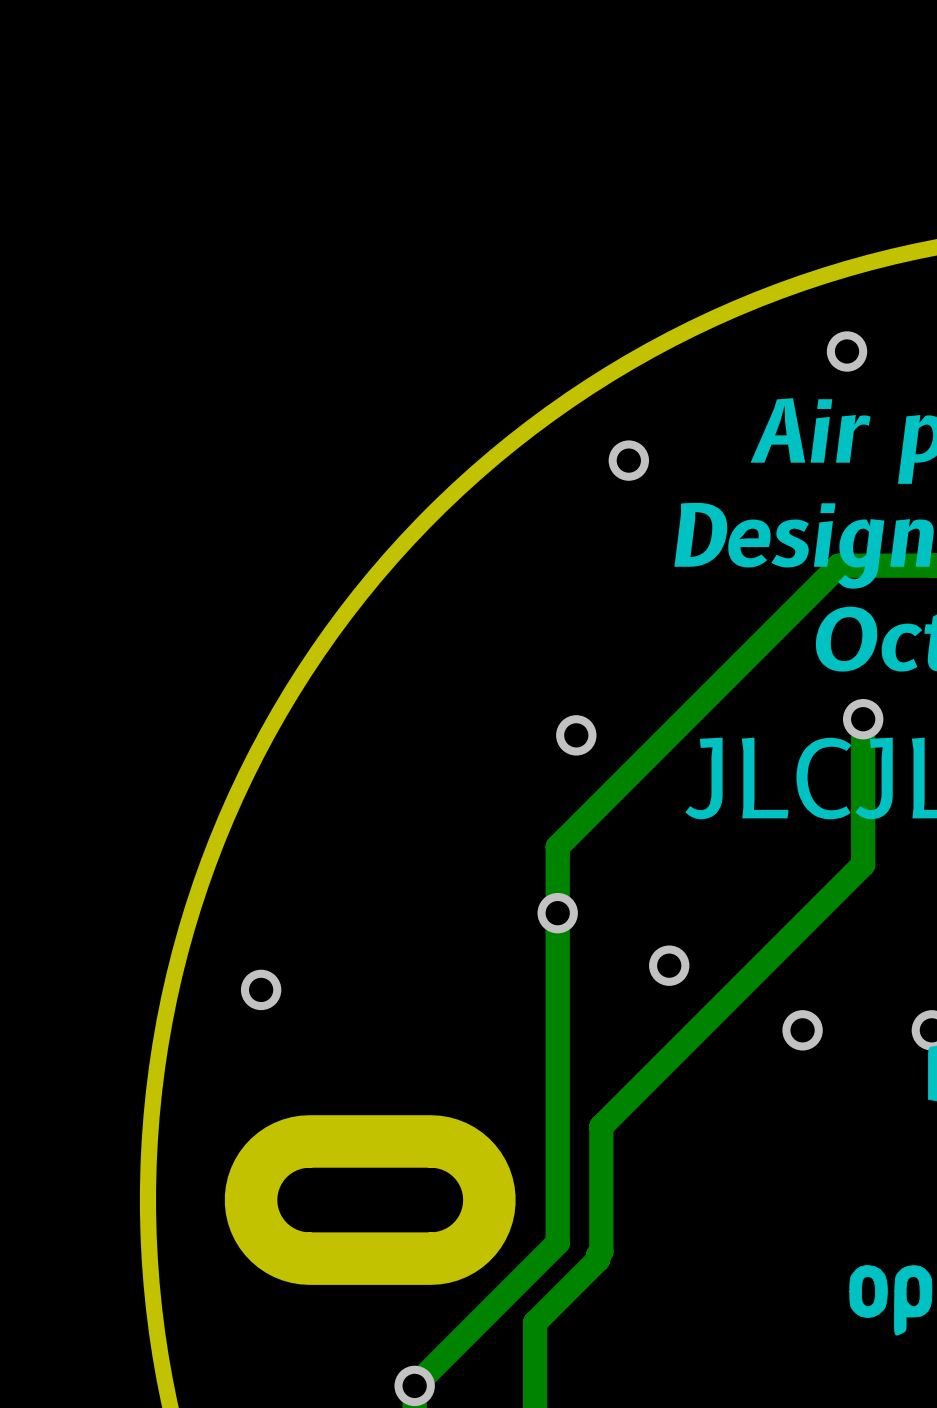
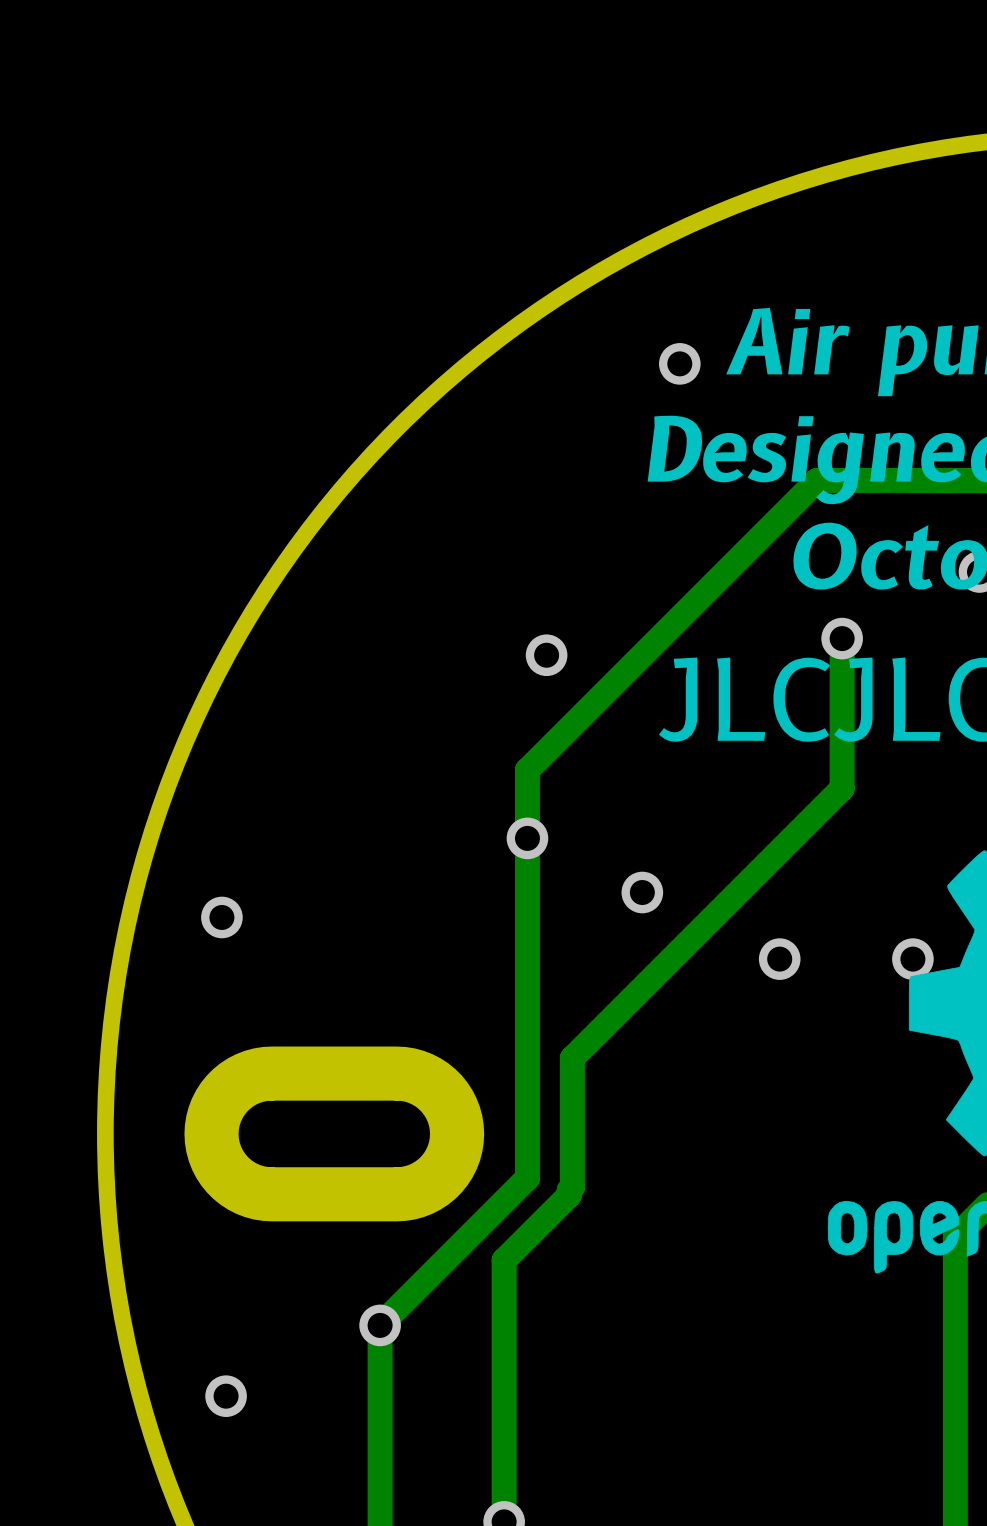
via: (847, 351) -> none
via position: (628, 460) -> (679, 363)

